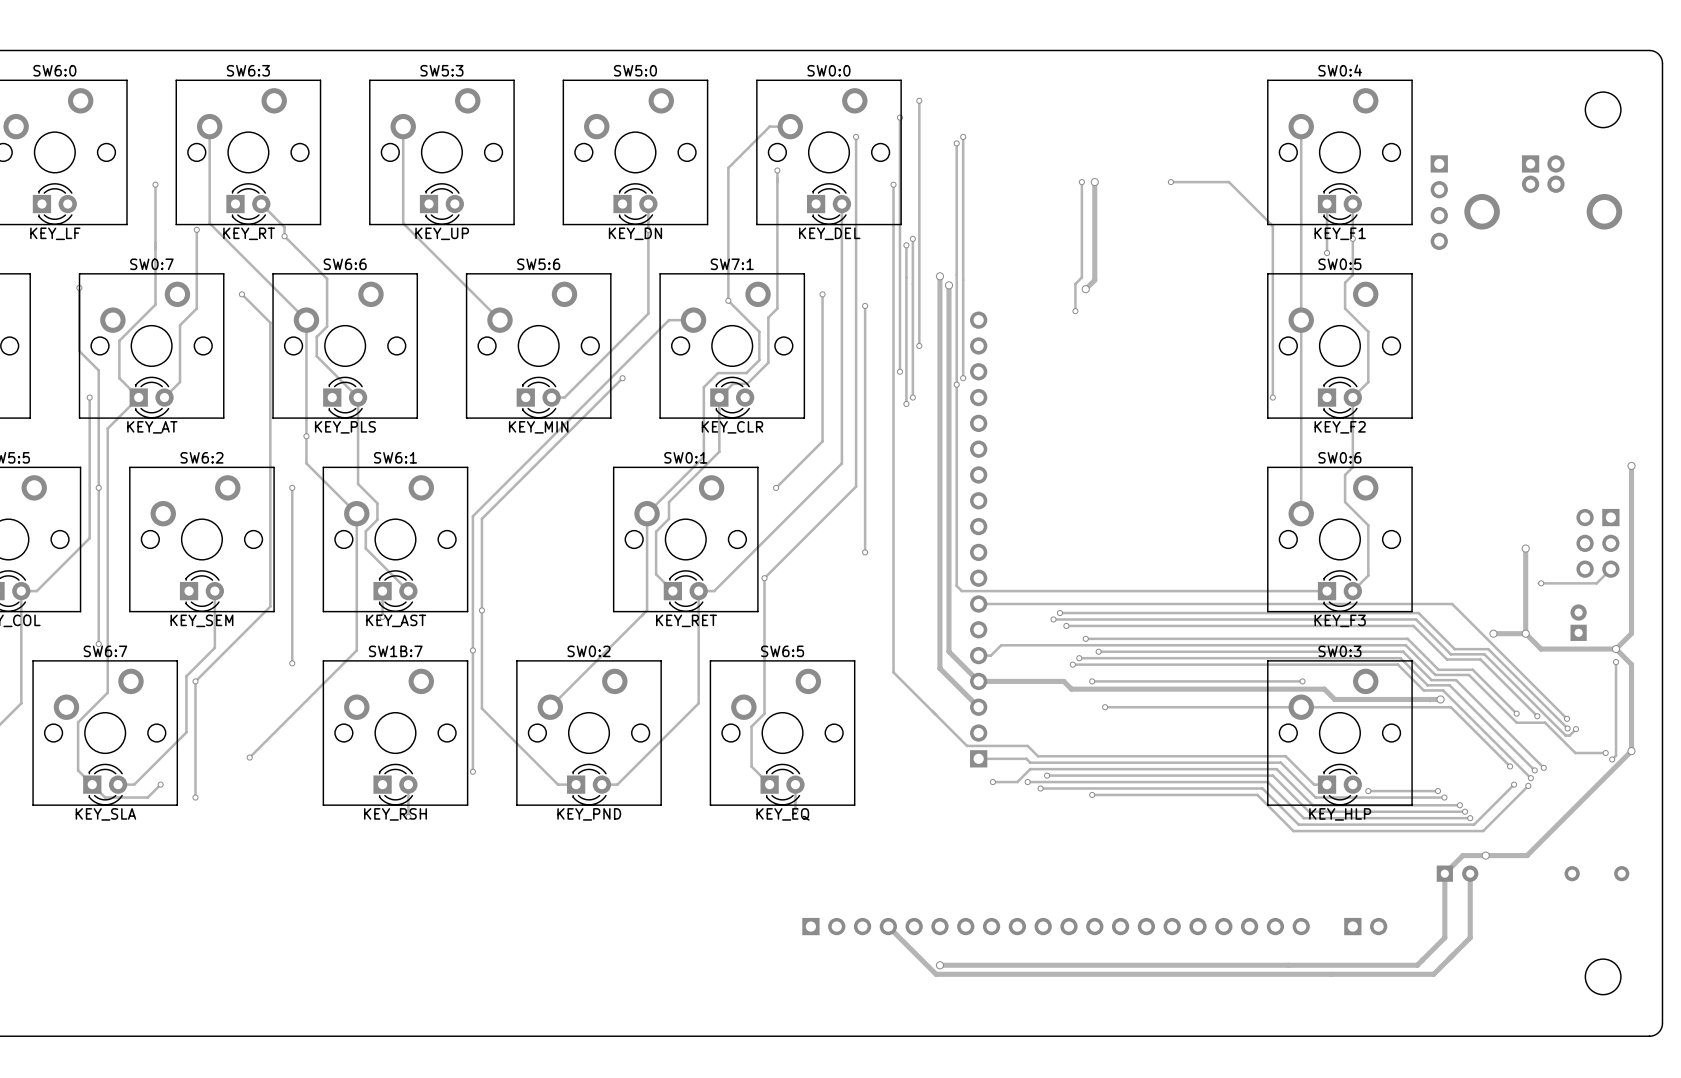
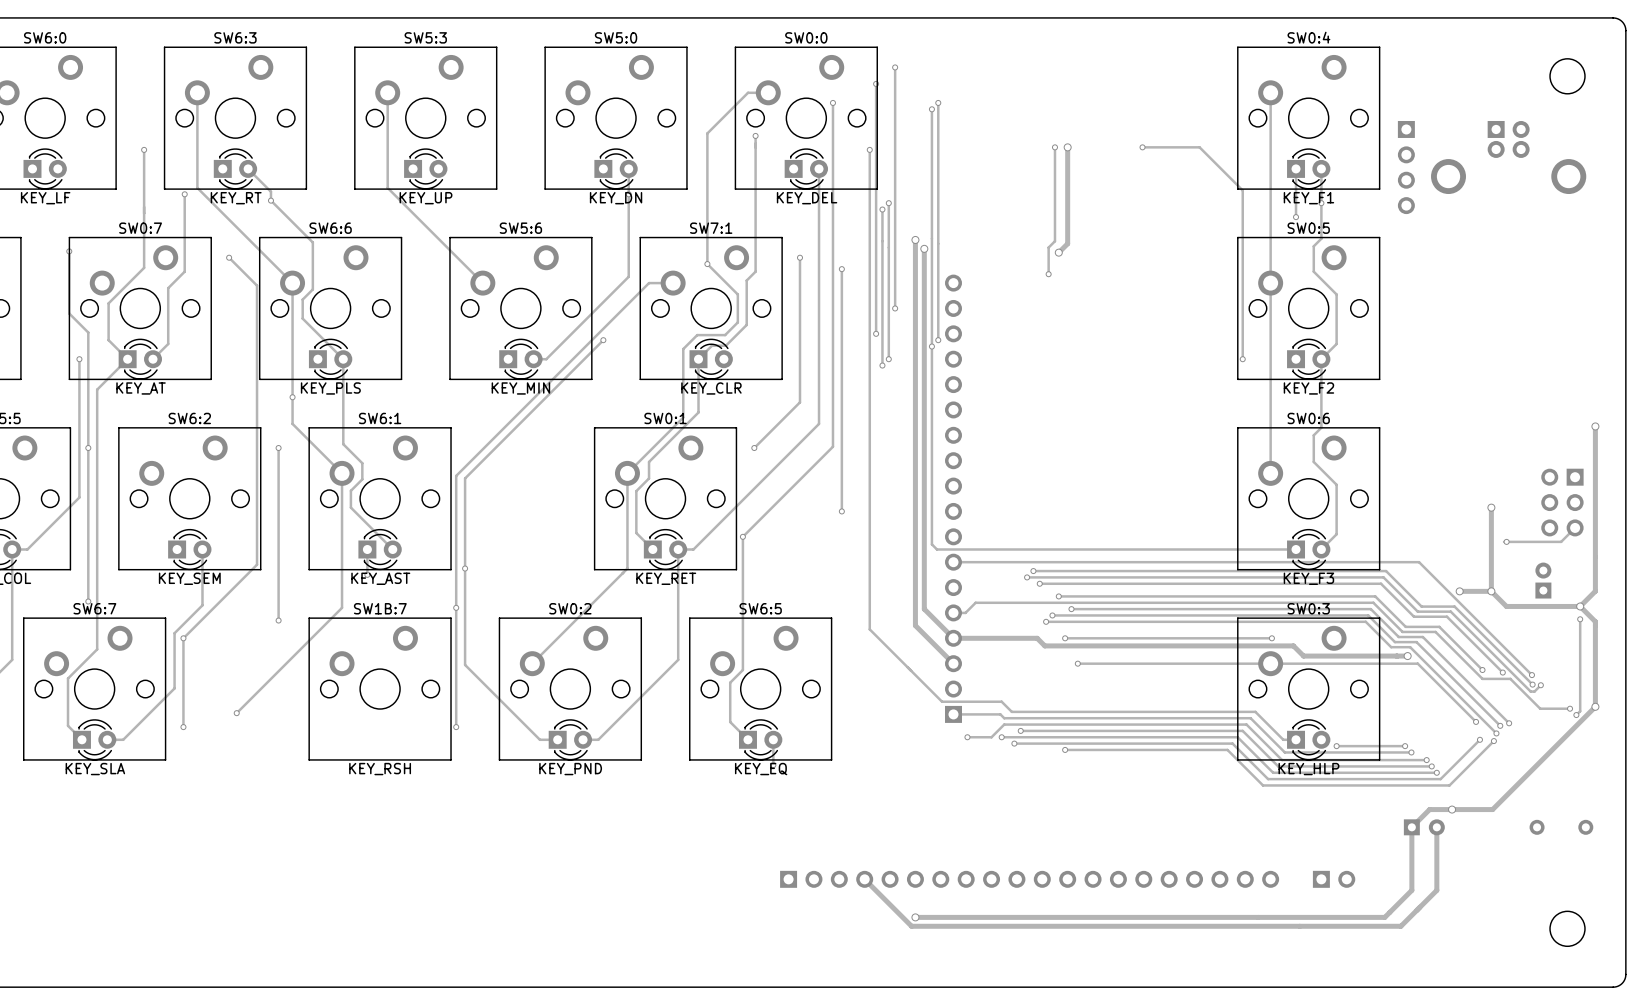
track: (195, 771) (195, 797) -> none
via: none -> (183, 727)
track: (92, 784) (105, 797) (147, 797) (160, 784) -> none
via: (160, 784) -> none
part: (395, 784) -> none
track: (408, 784) (408, 816) -> none
via: (195, 797) -> none
via: (408, 816) -> none

